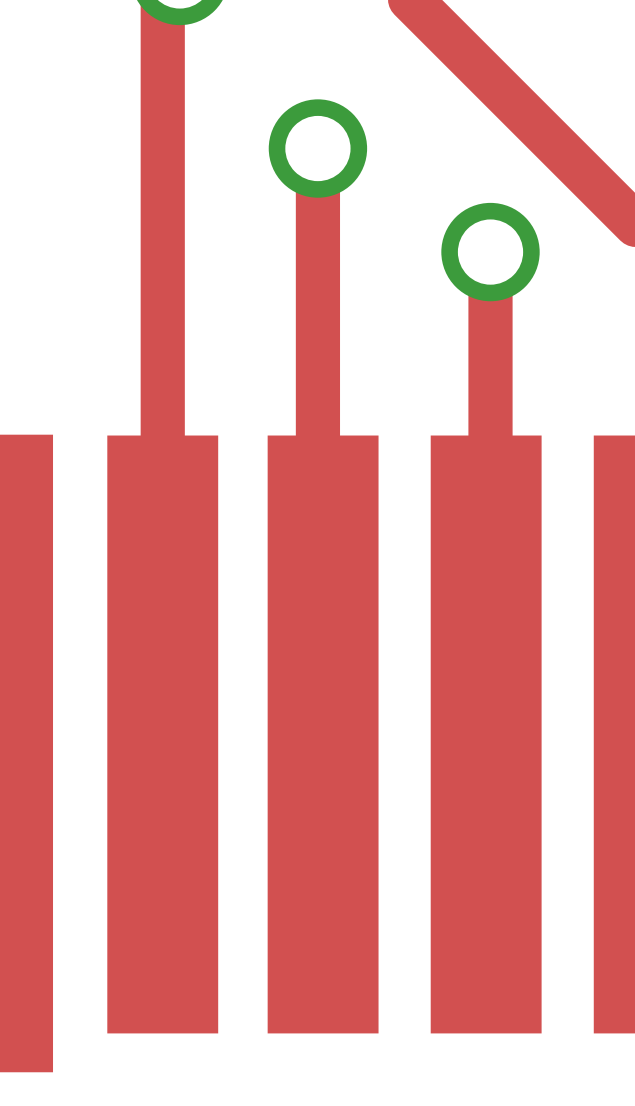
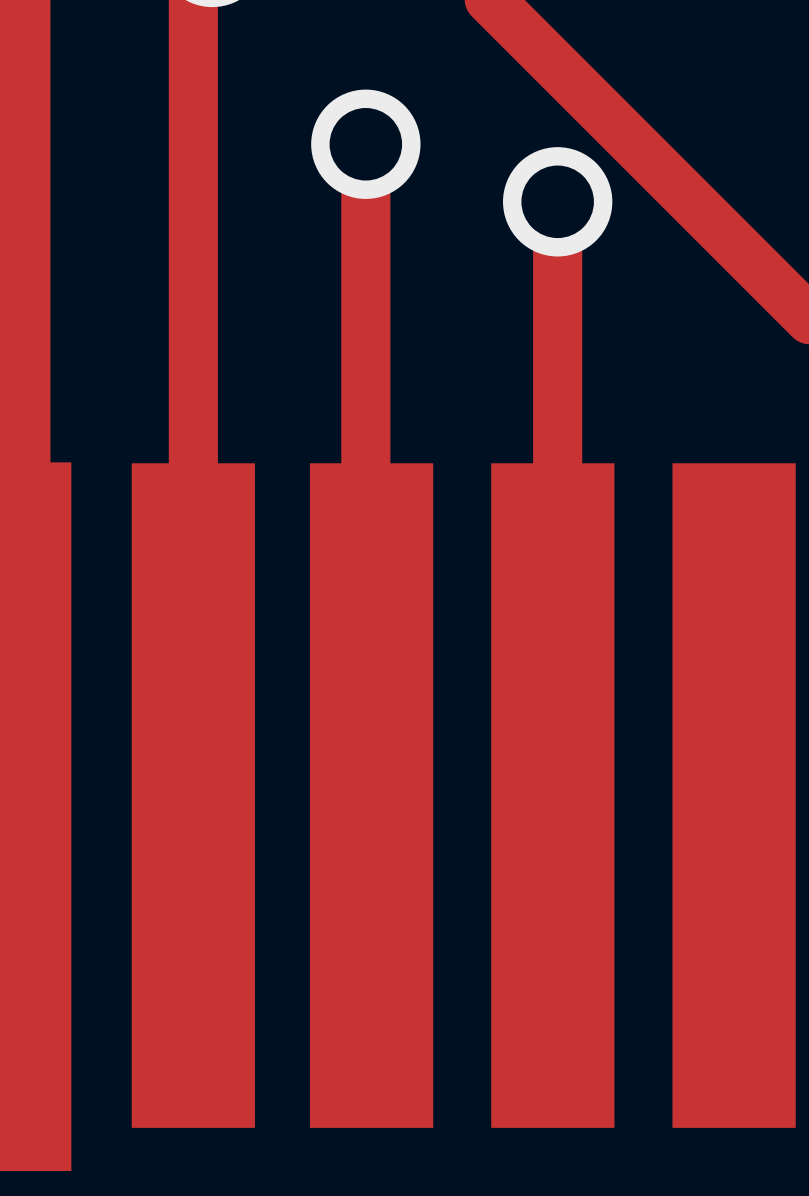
via position: (490, 252) -> (557, 201)

